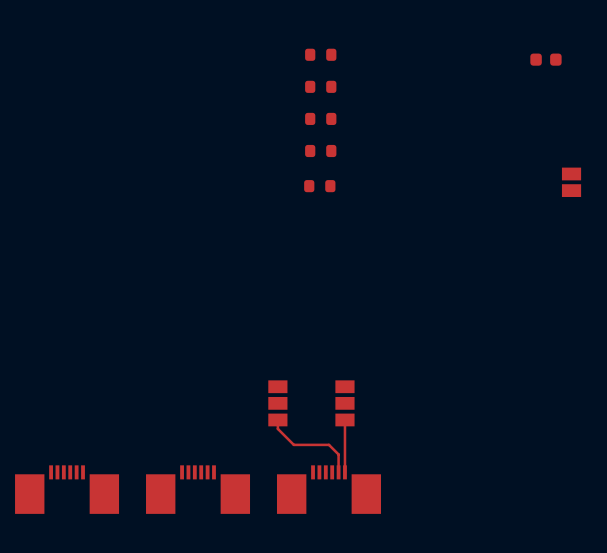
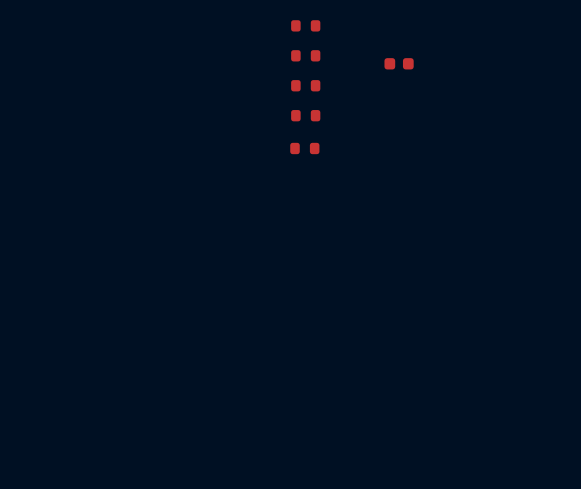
part position: (545, 59) -> (399, 63)
part: (571, 182) -> none
part: (277, 403) -> none
part: (344, 403) -> none
top track: (277, 419) (277, 428) (293, 444) (328, 444) (338, 454) (338, 472) -> none
top track: (344, 419) (344, 472) -> none
part: (67, 489) -> none
part: (198, 489) -> none
part: (328, 489) -> none

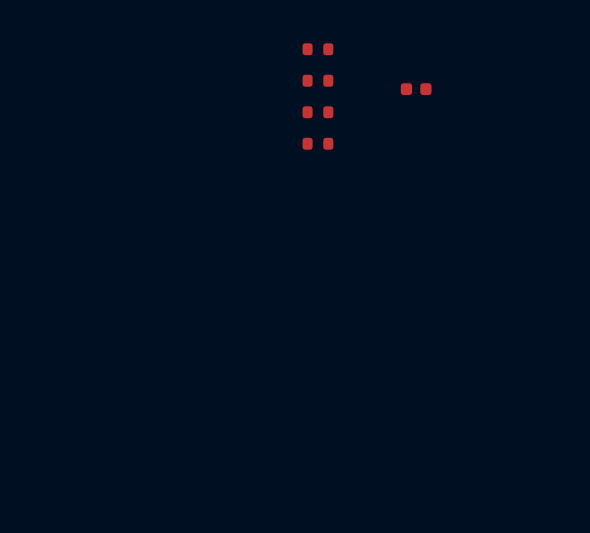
part: (304, 148) -> none

